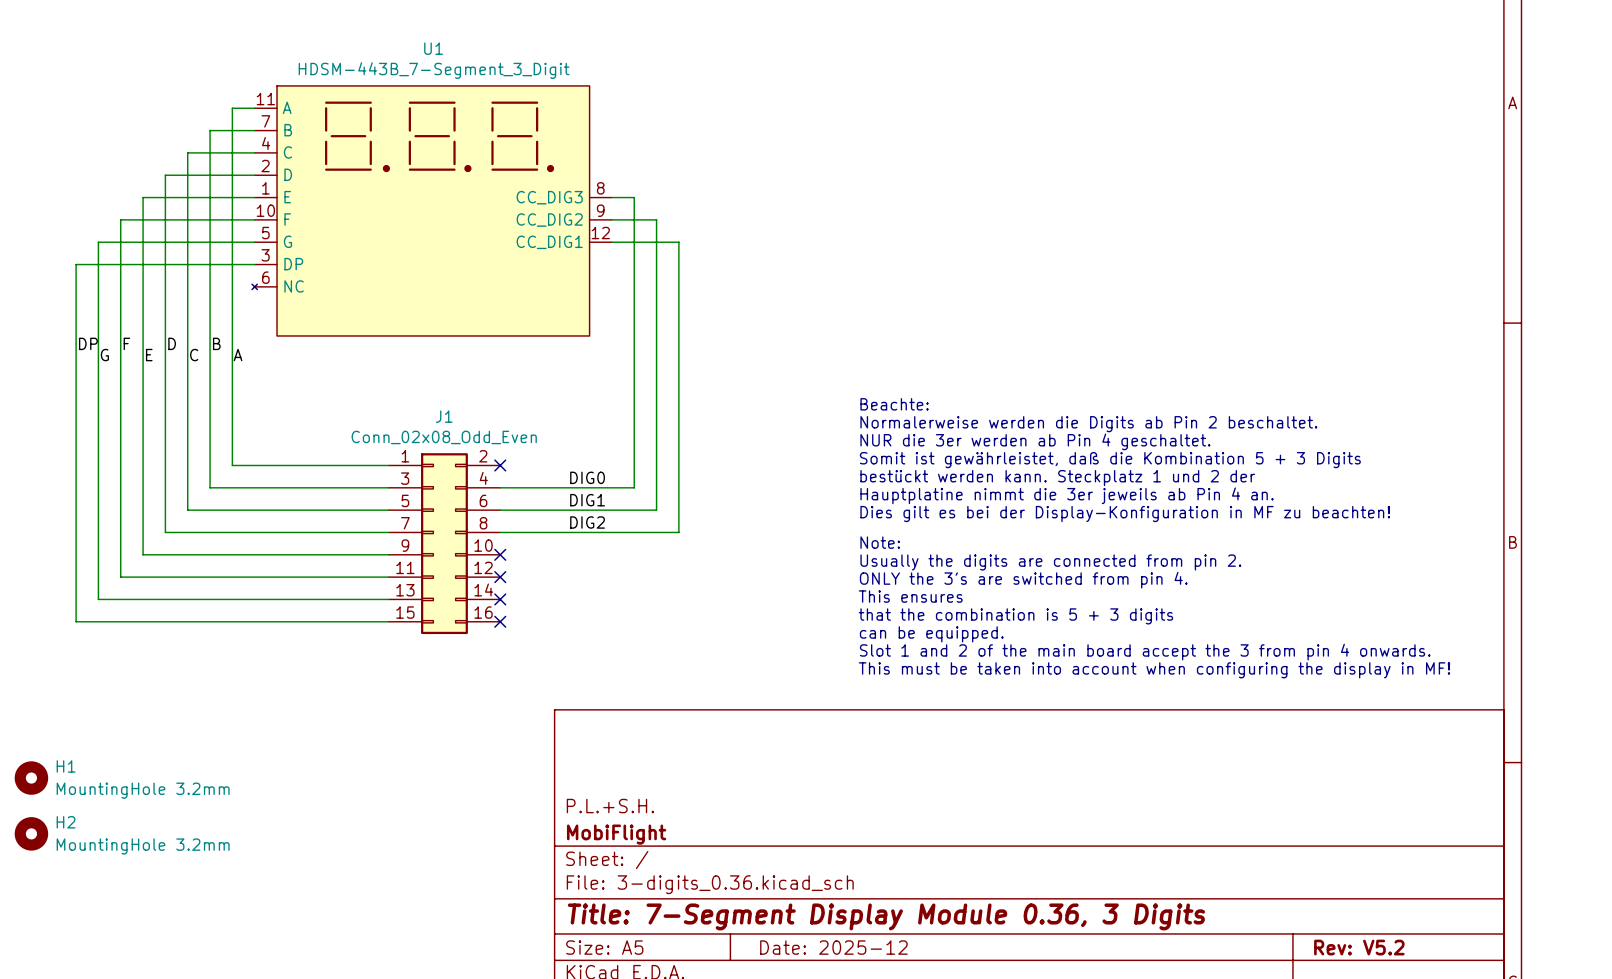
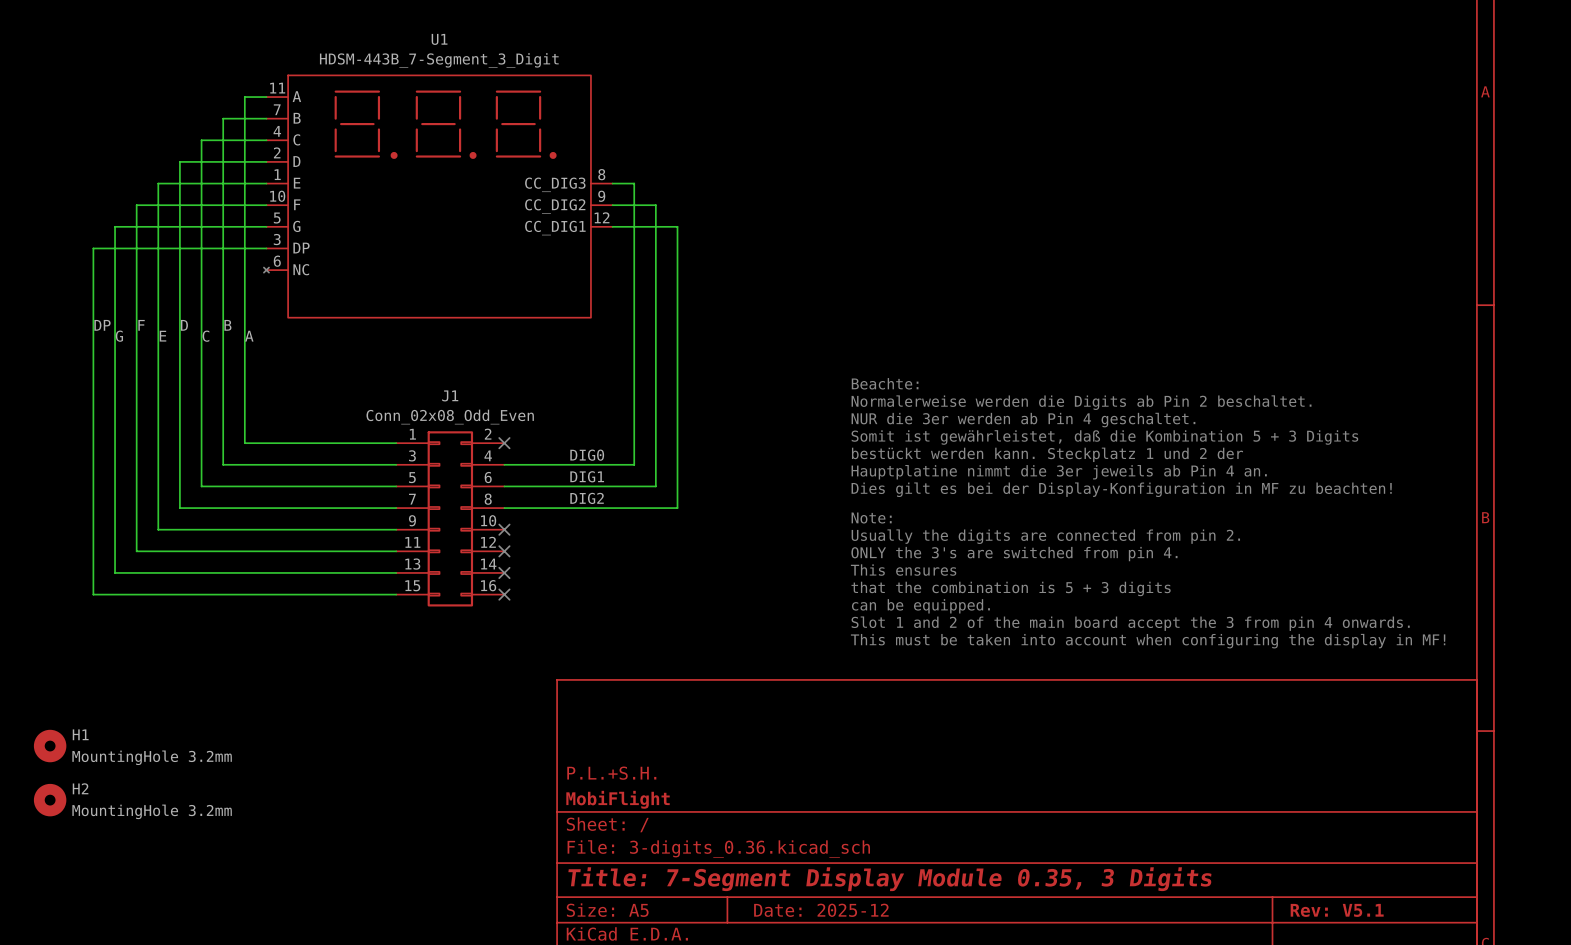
title block: Title: 7-Segment Display Module 0.36, 3 Digits (886, 916) -> Title: 7-Segment Display Module 0.35, 3 Digits (889, 879)
title block: Rev: V5.2 (1359, 947) -> Rev: V5.1 (1337, 910)

